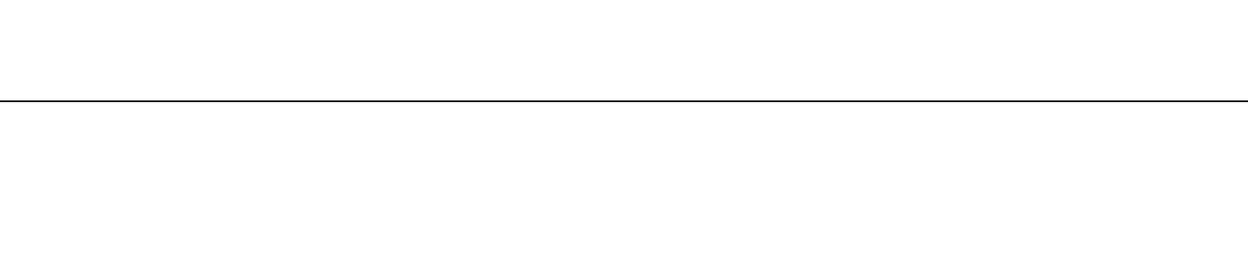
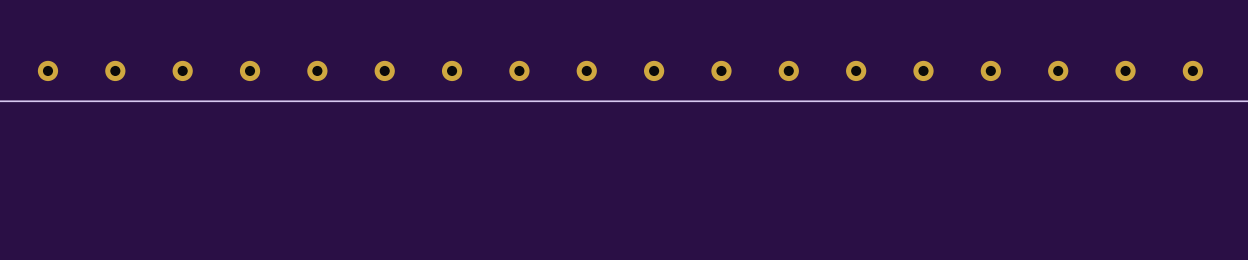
via: none -> (47, 70)
via: none -> (115, 70)
via: none -> (182, 70)
via: none -> (250, 70)
via: none -> (317, 70)
via: none -> (384, 70)
via: none -> (452, 70)
via: none -> (519, 70)
via: none -> (586, 70)
via: none -> (654, 70)
via: none -> (721, 70)
via: none -> (788, 70)
via: none -> (856, 70)
via: none -> (923, 70)
via: none -> (990, 70)
via: none -> (1058, 70)
via: none -> (1125, 70)
via: none -> (1192, 70)

